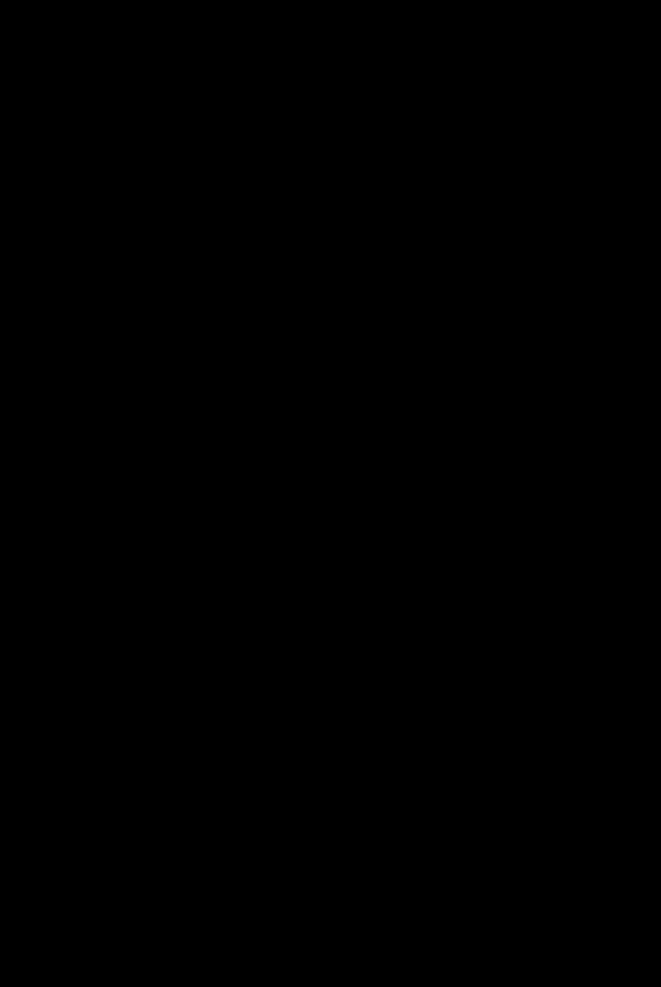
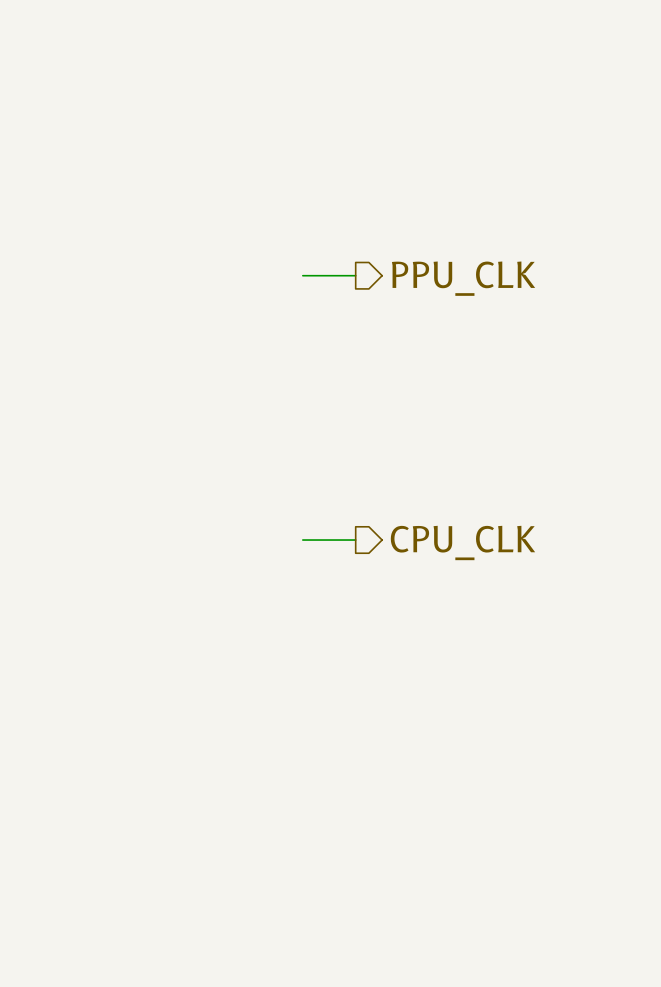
wire: none -> (302, 275) (355, 275)
hierarchical label: none -> PPU_CLK (463, 278)
wire: none -> (302, 540) (355, 540)
hierarchical label: none -> CPU_CLK (462, 542)

